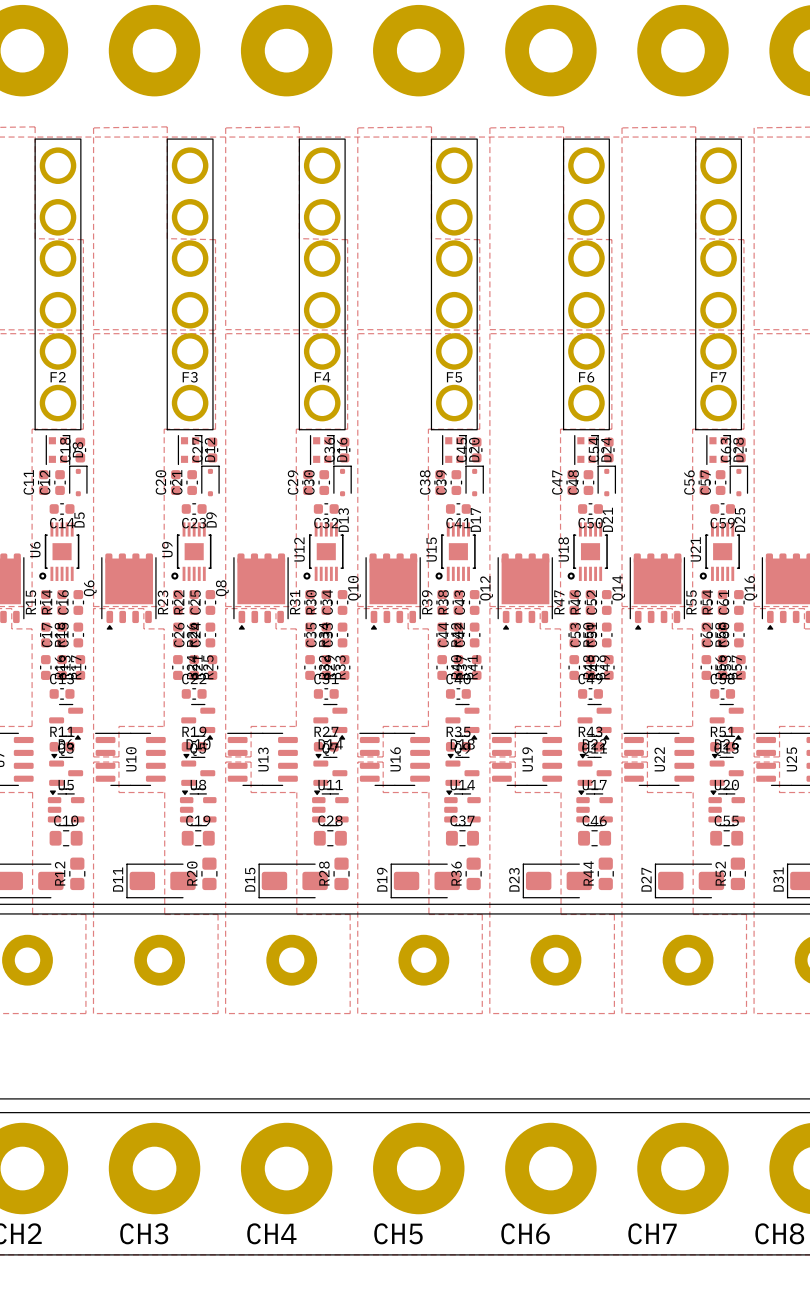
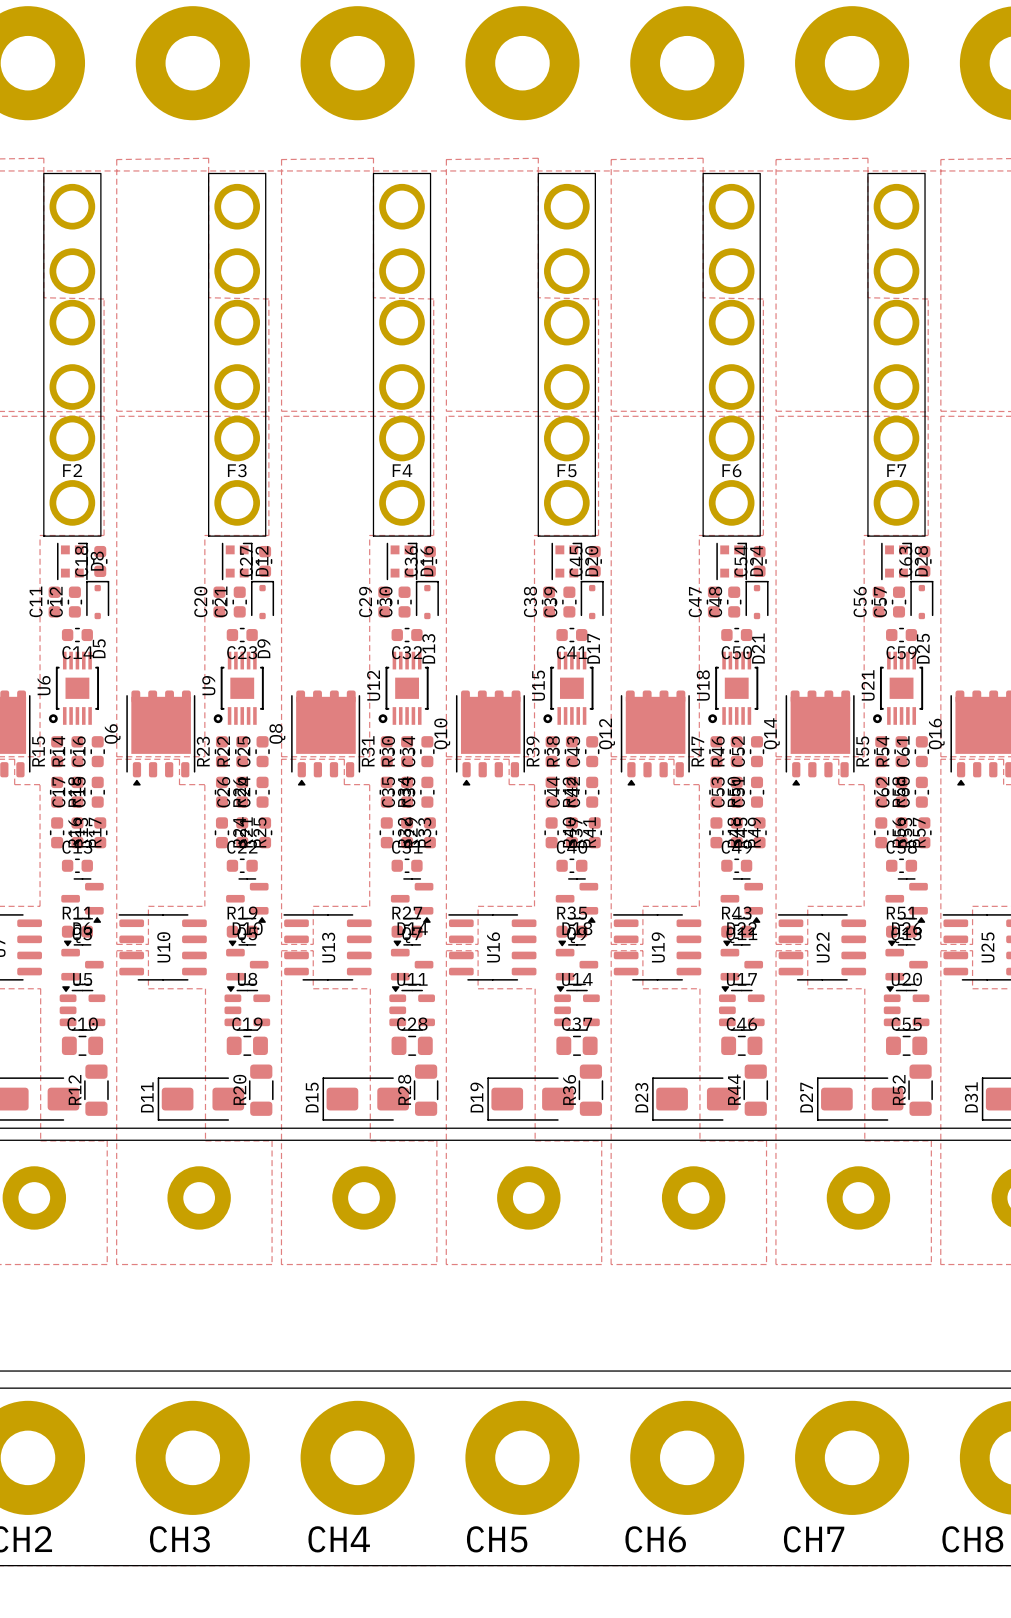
R12 footprint: [69, 857, 86, 891] -> [84, 1064, 109, 1116]
R20 footprint: [201, 857, 218, 891] -> [248, 1064, 274, 1116]
R28 footprint: [333, 857, 350, 891] -> [413, 1064, 439, 1116]
R36 footprint: [465, 857, 482, 891] -> [578, 1064, 604, 1116]
R44 footprint: [597, 857, 614, 891] -> [743, 1064, 769, 1116]
R52 footprint: [729, 857, 746, 891] -> [908, 1064, 933, 1116]

